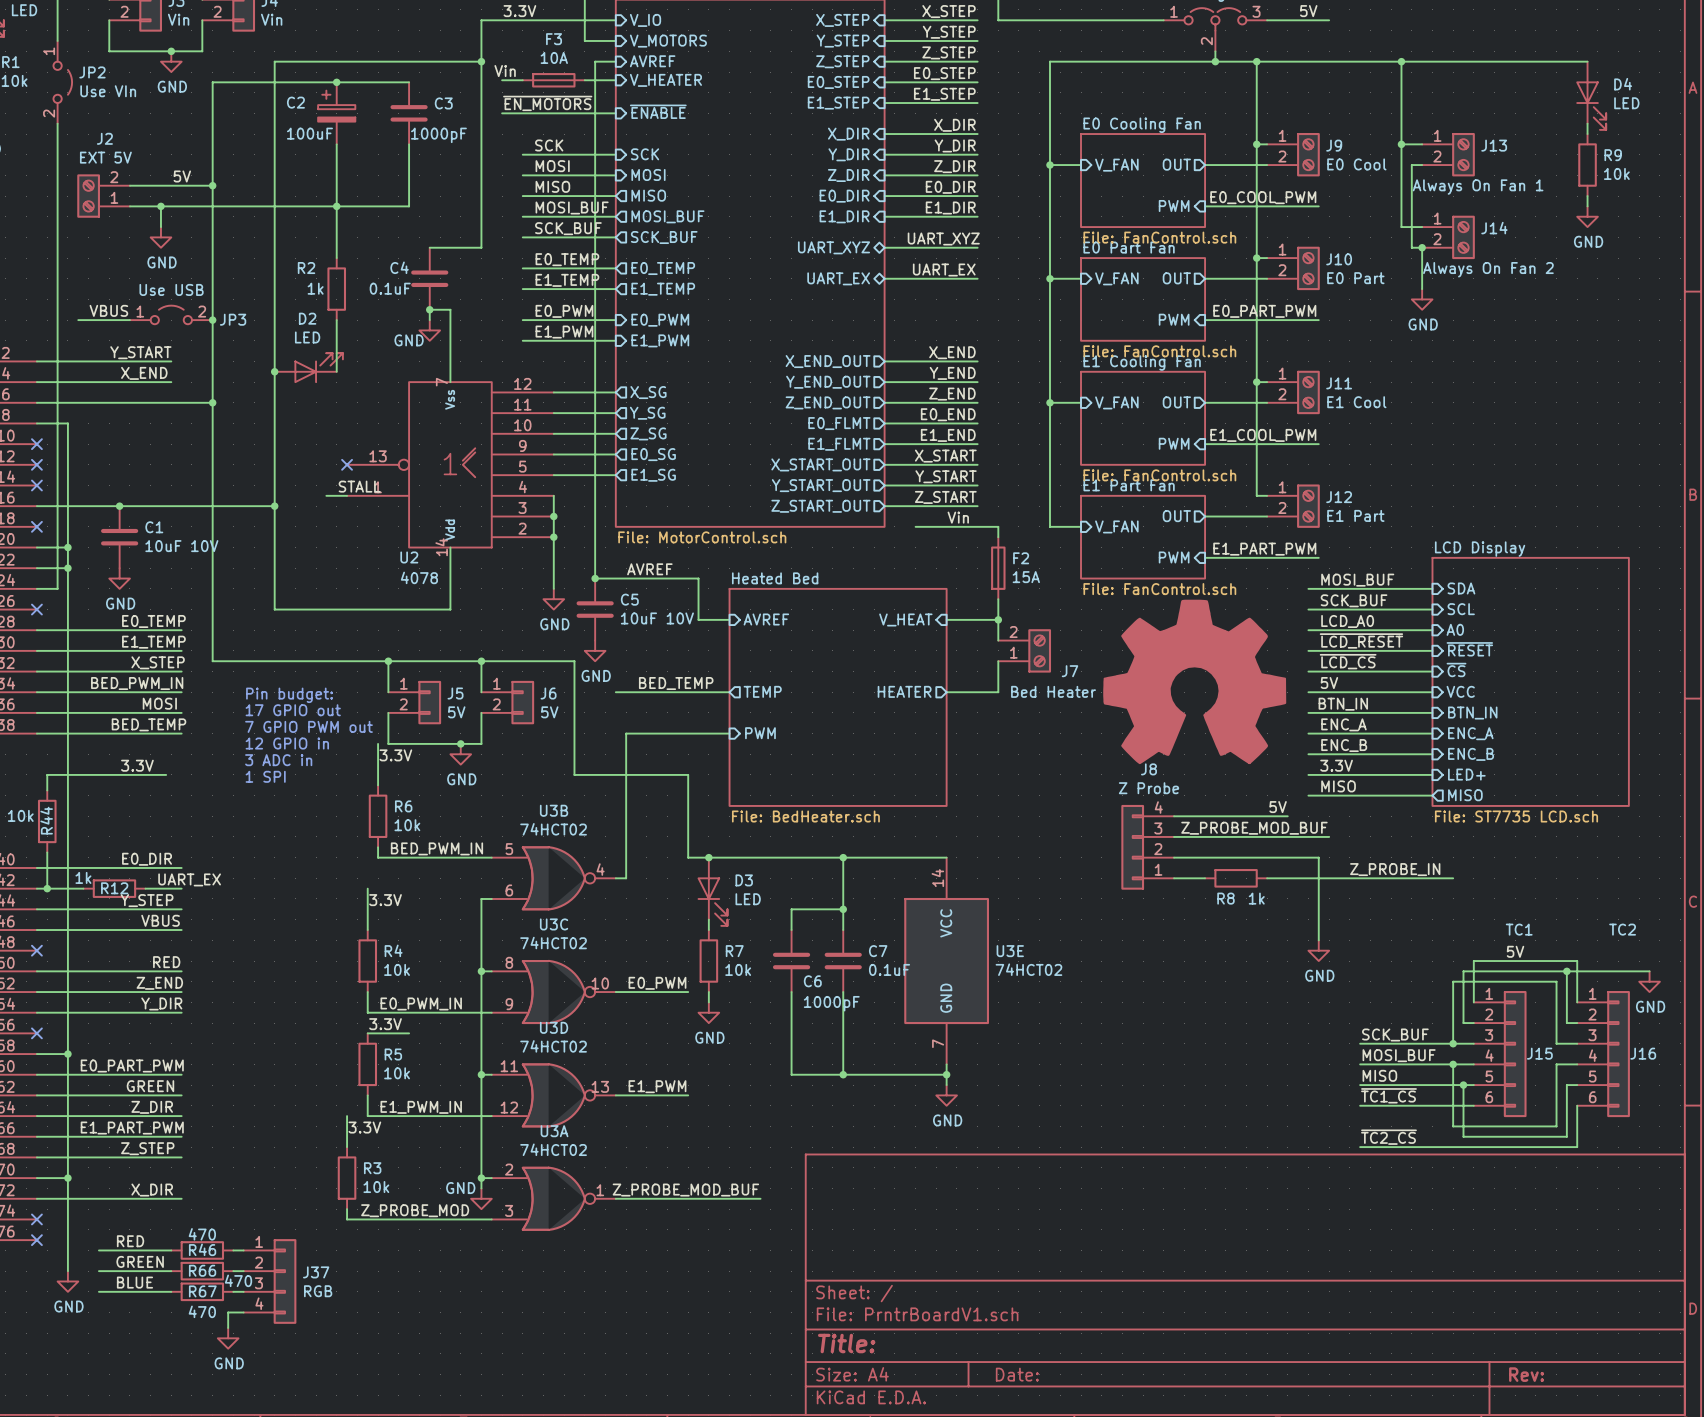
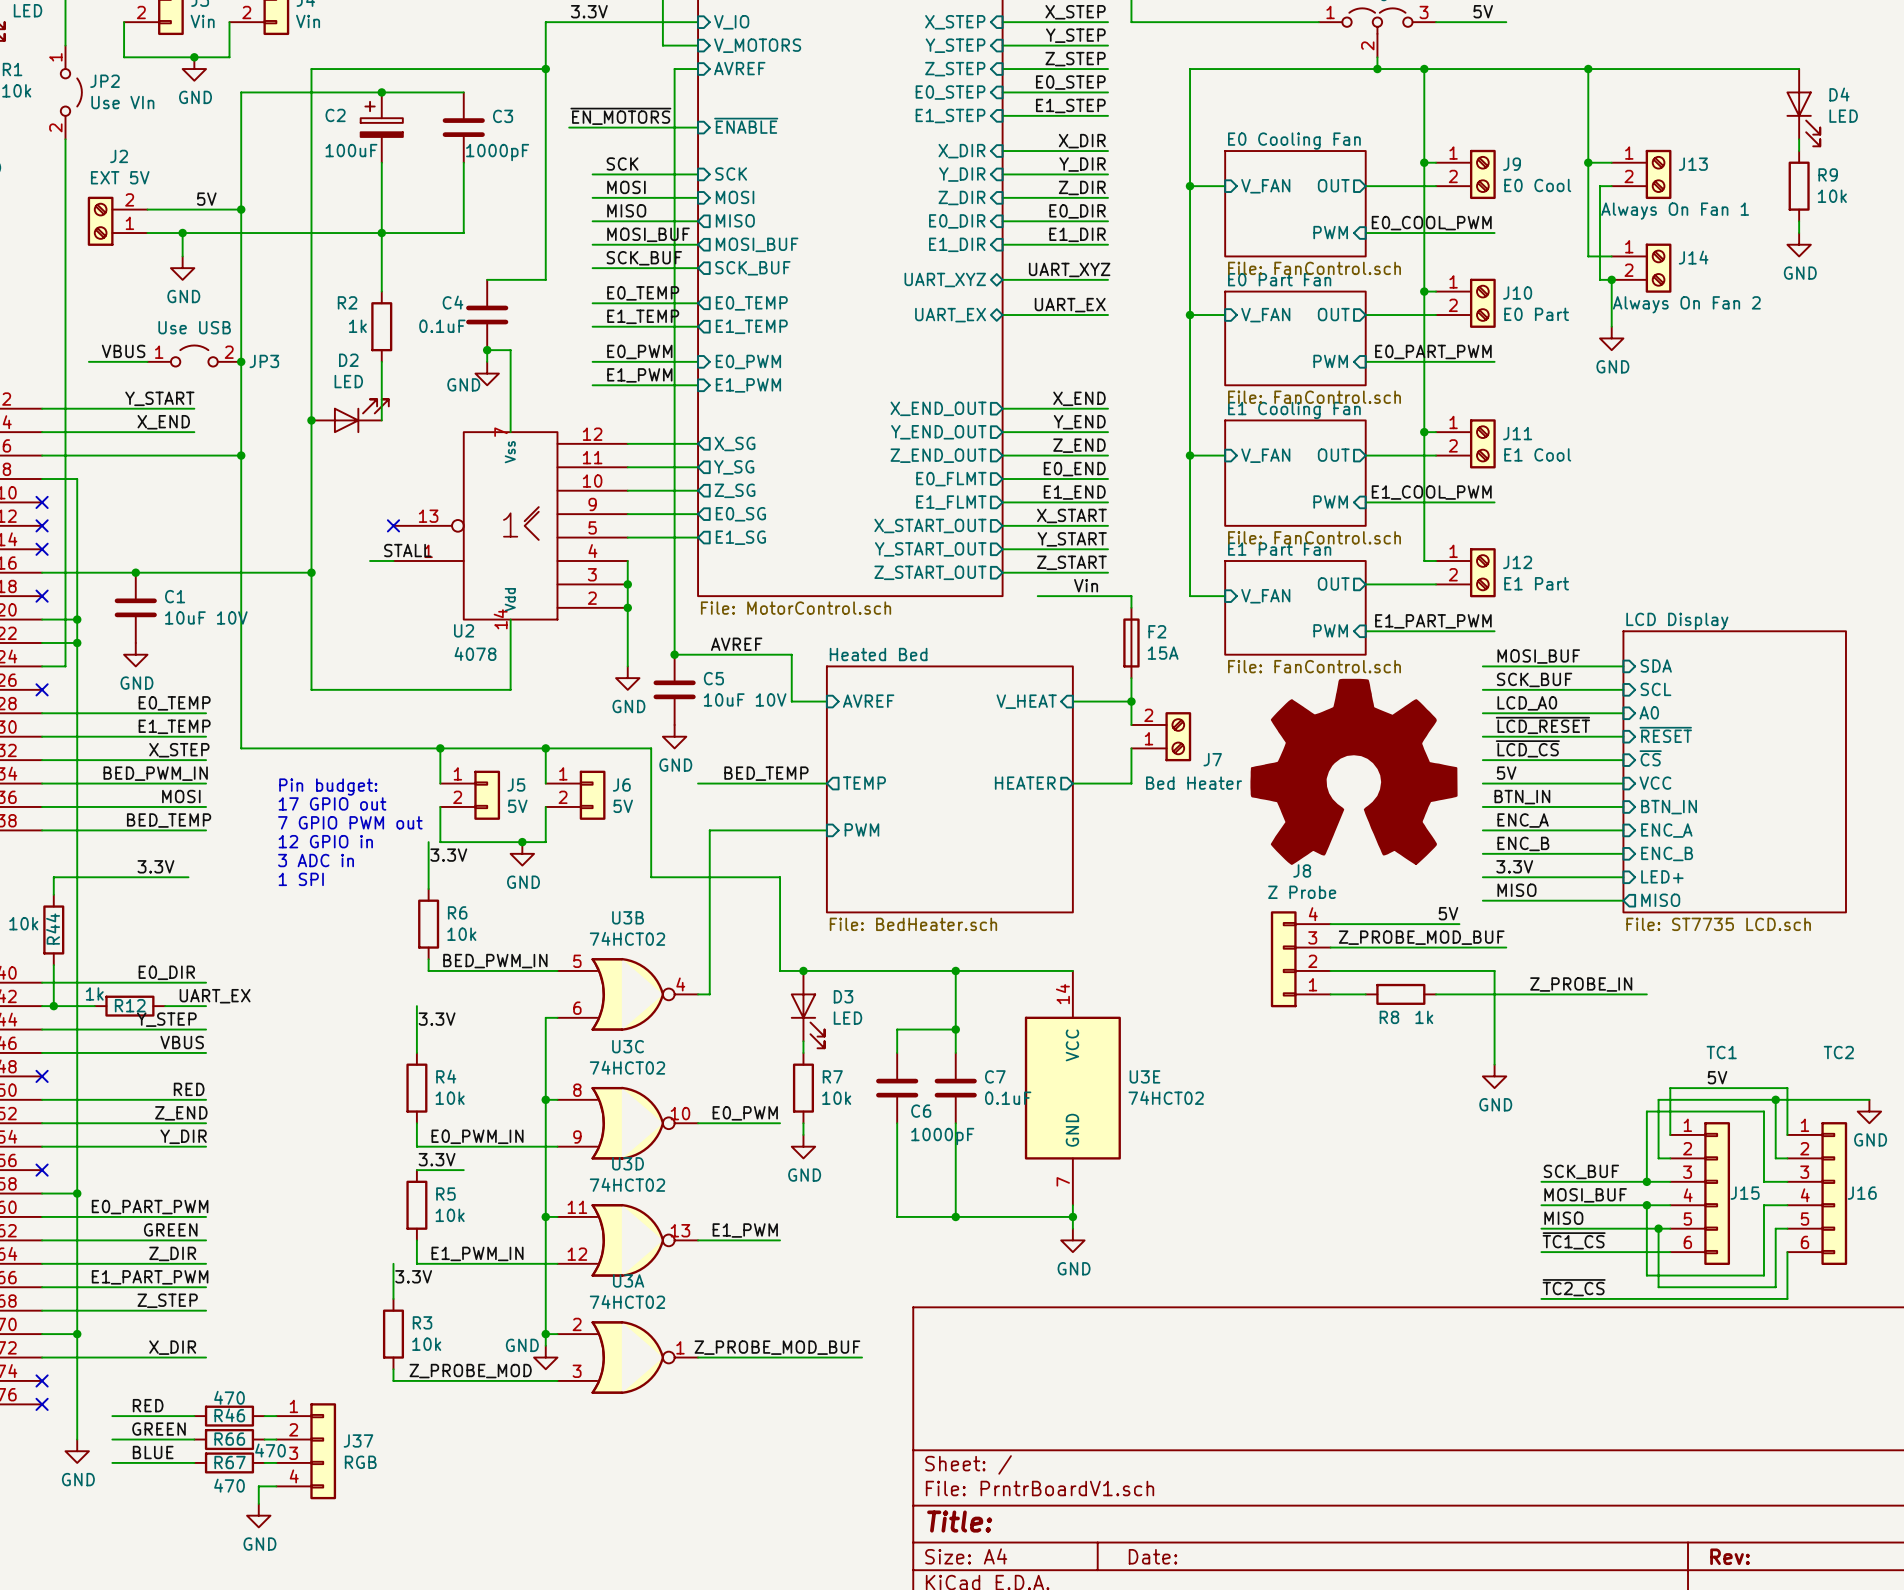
label: Vin (505, 71) -> none
wire: (502, 80) (522, 80) -> none
F3: 10A (553, 80) -> none
wire: (584, 80) (615, 80) -> none
sheet pin: V_HEATER (665, 80) -> none

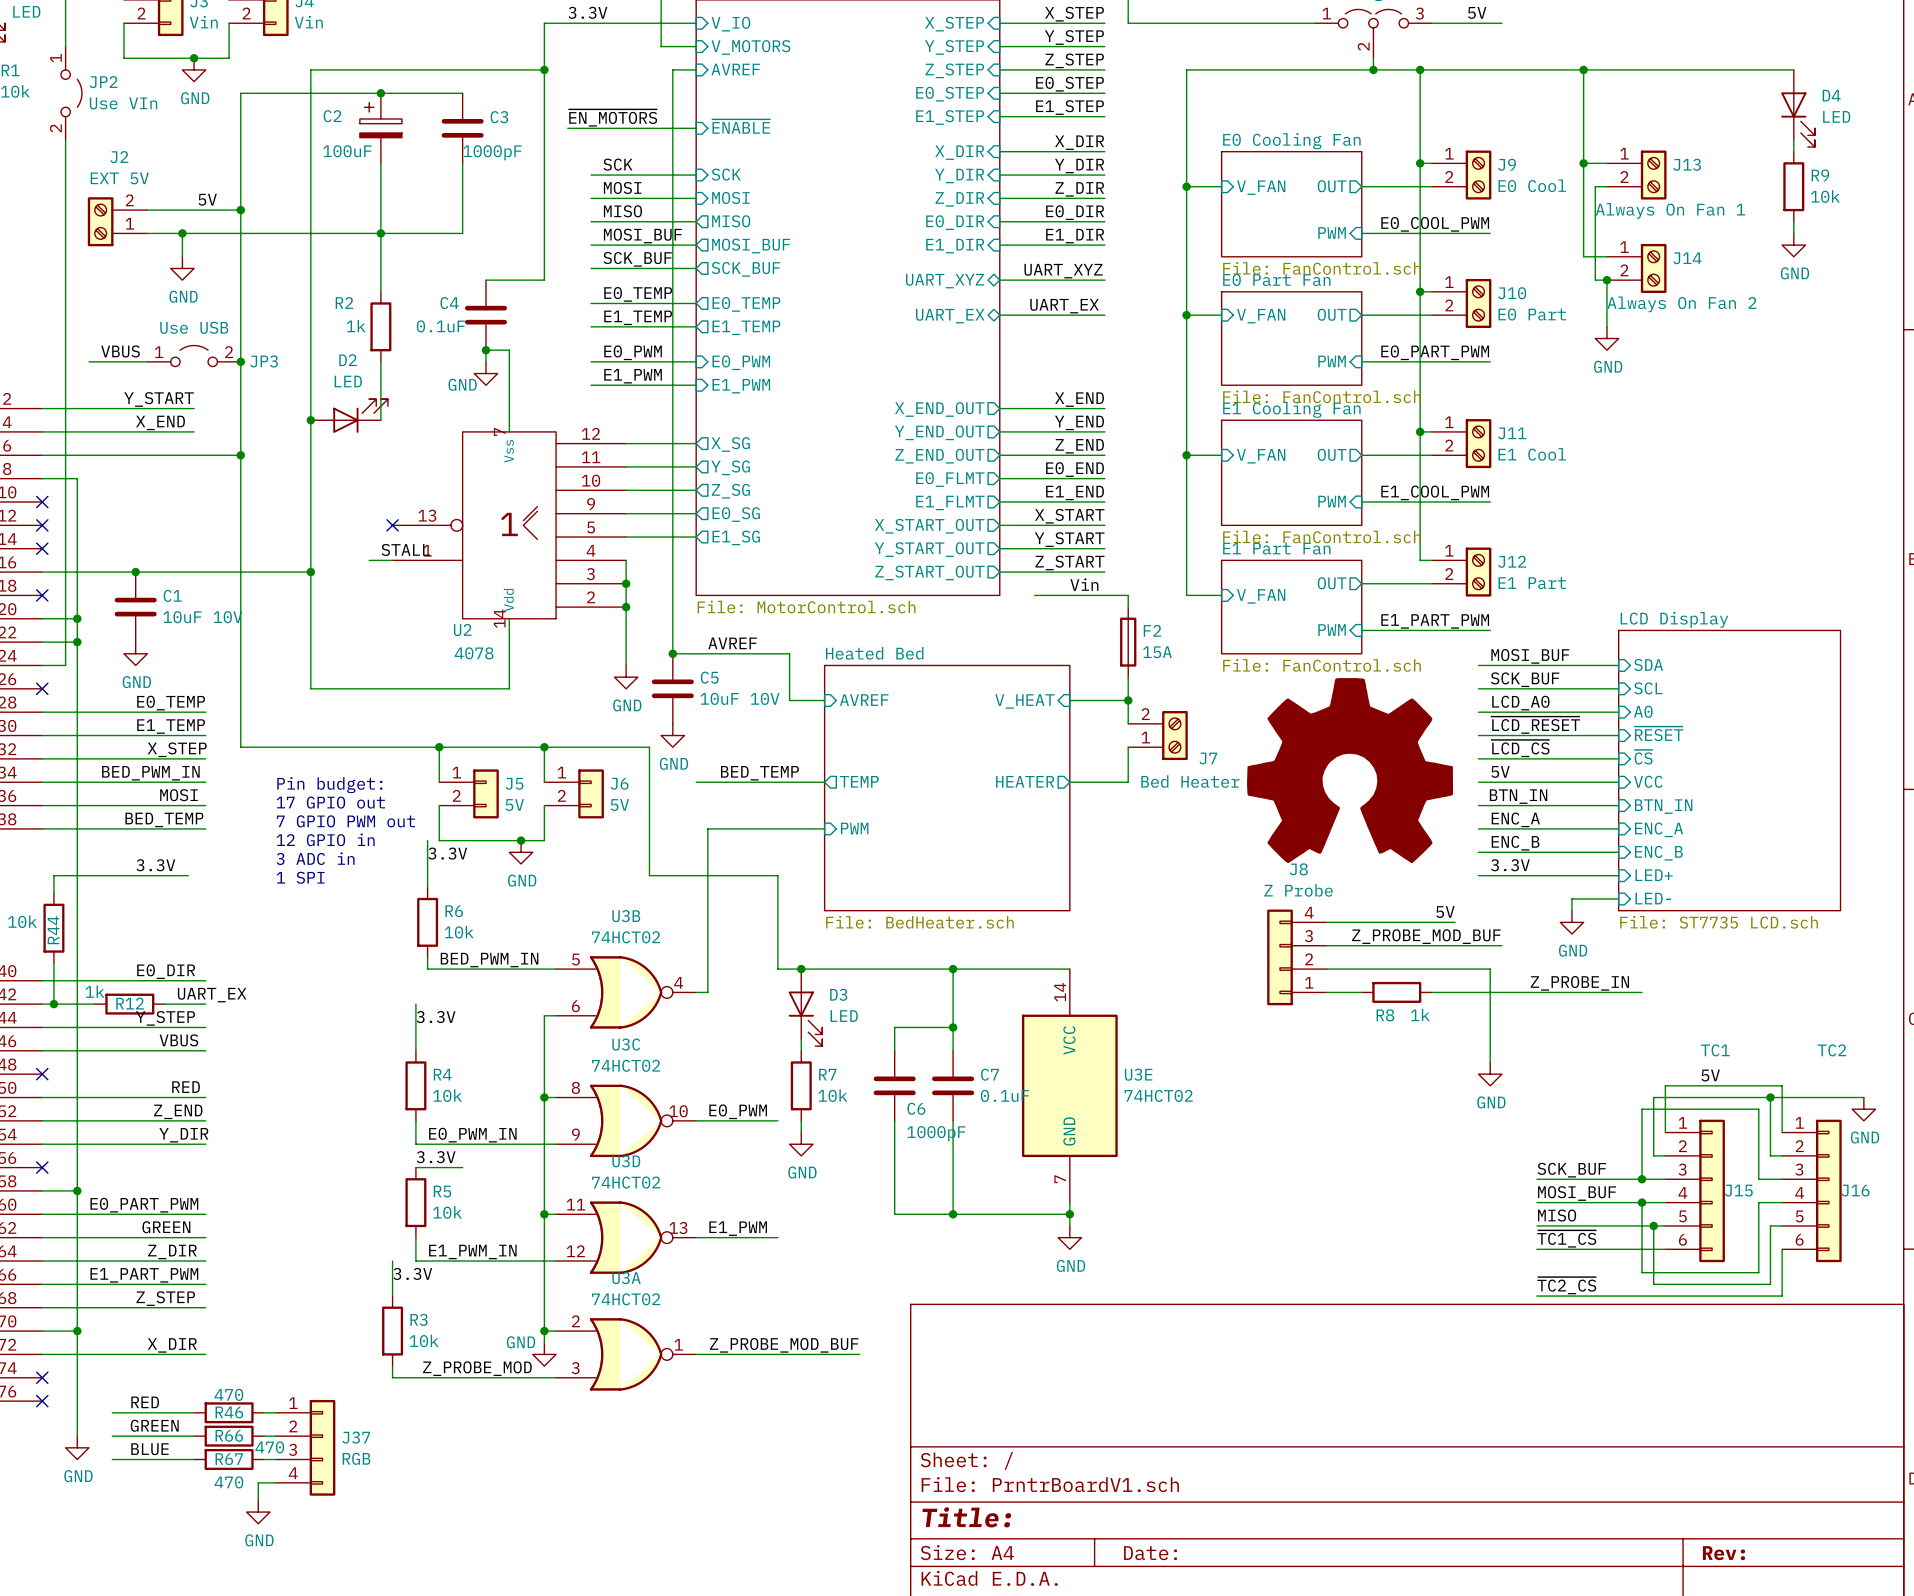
label: MISO (1516, 890) -> none
wire: (1482, 900) (1576, 900) -> (1571, 910) (1571, 899)
sheet pin shape: output (1660, 900) -> input (1653, 898)
sheet pin: MISO (1660, 900) -> LED- (1653, 898)
power symbol: none -> GND (1571, 922)

